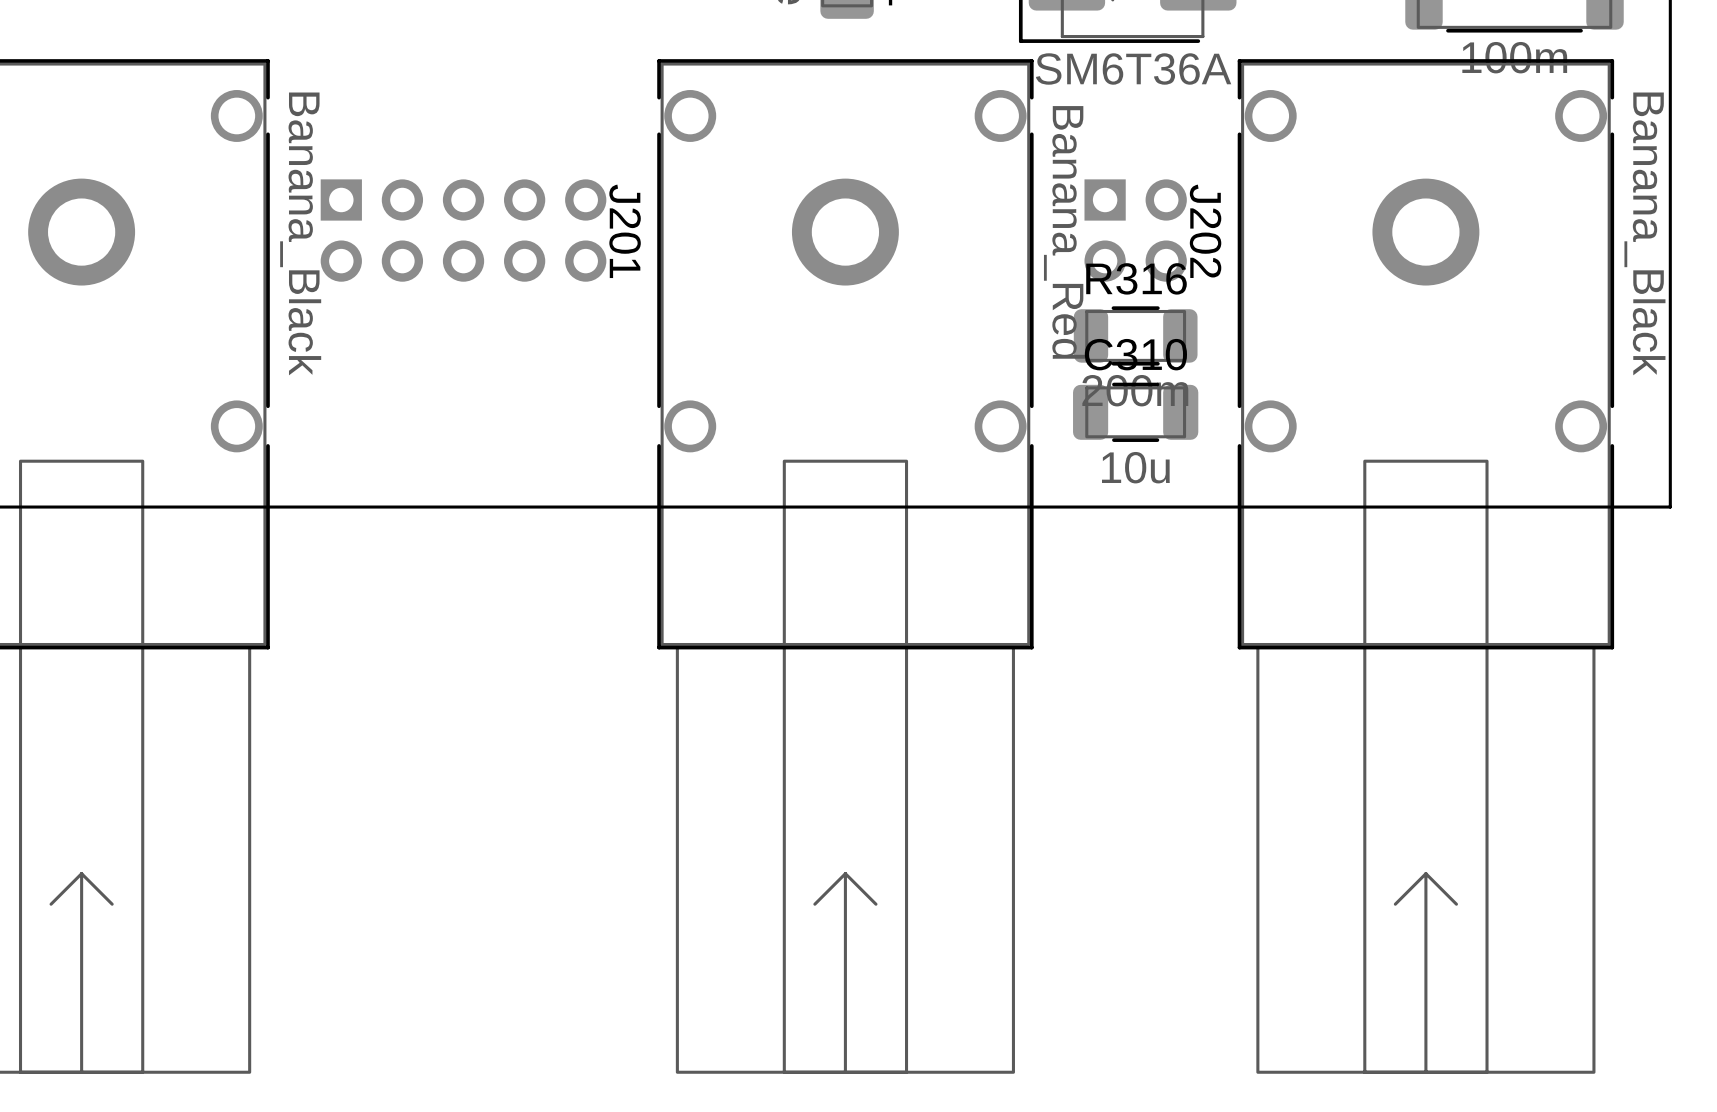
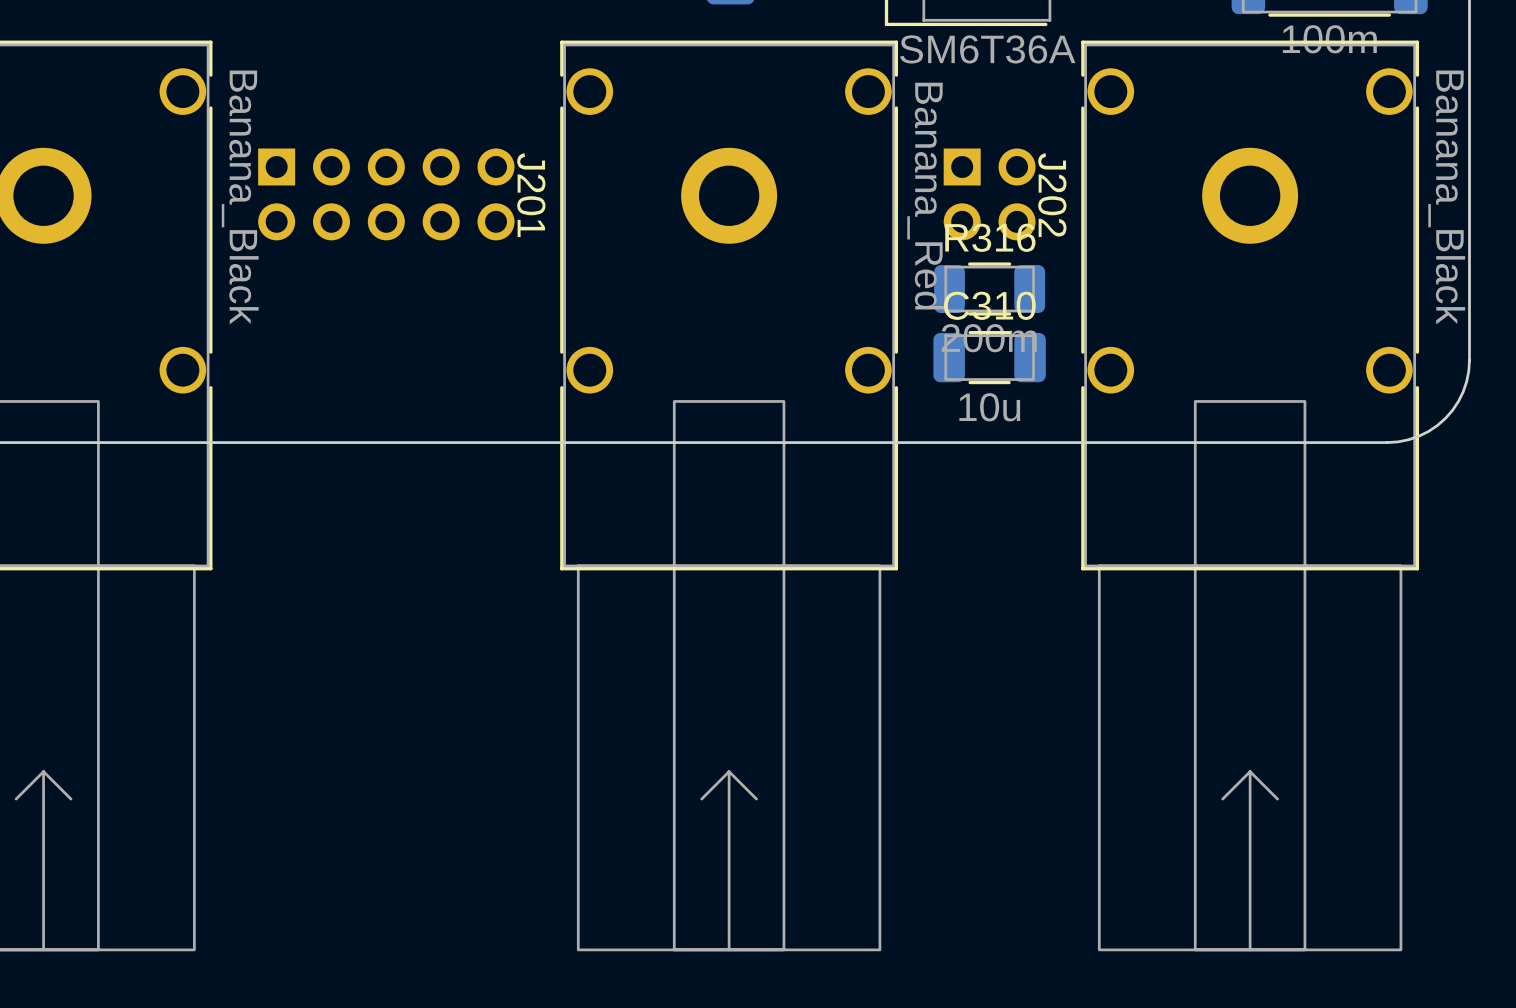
board edge: (1670, 415) (1670, 507) (1578, 507) -> (1469, 360) (1463, 391) (1445, 418) (1418, 436) (1387, 442)

